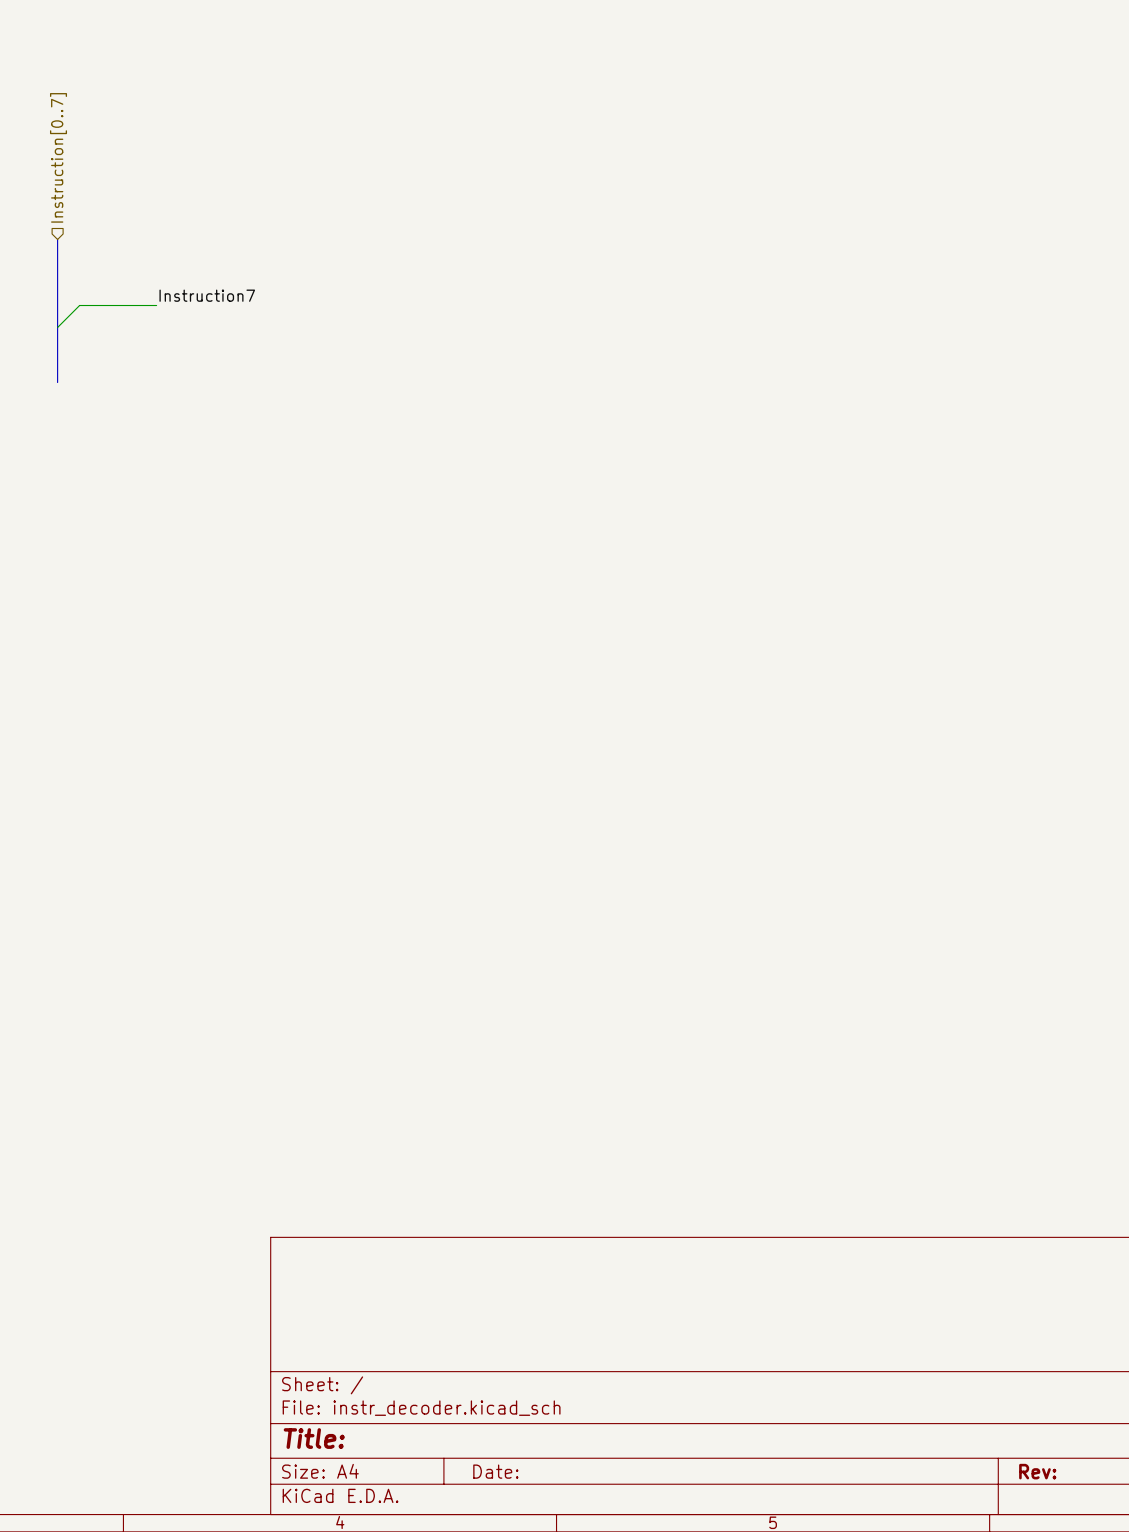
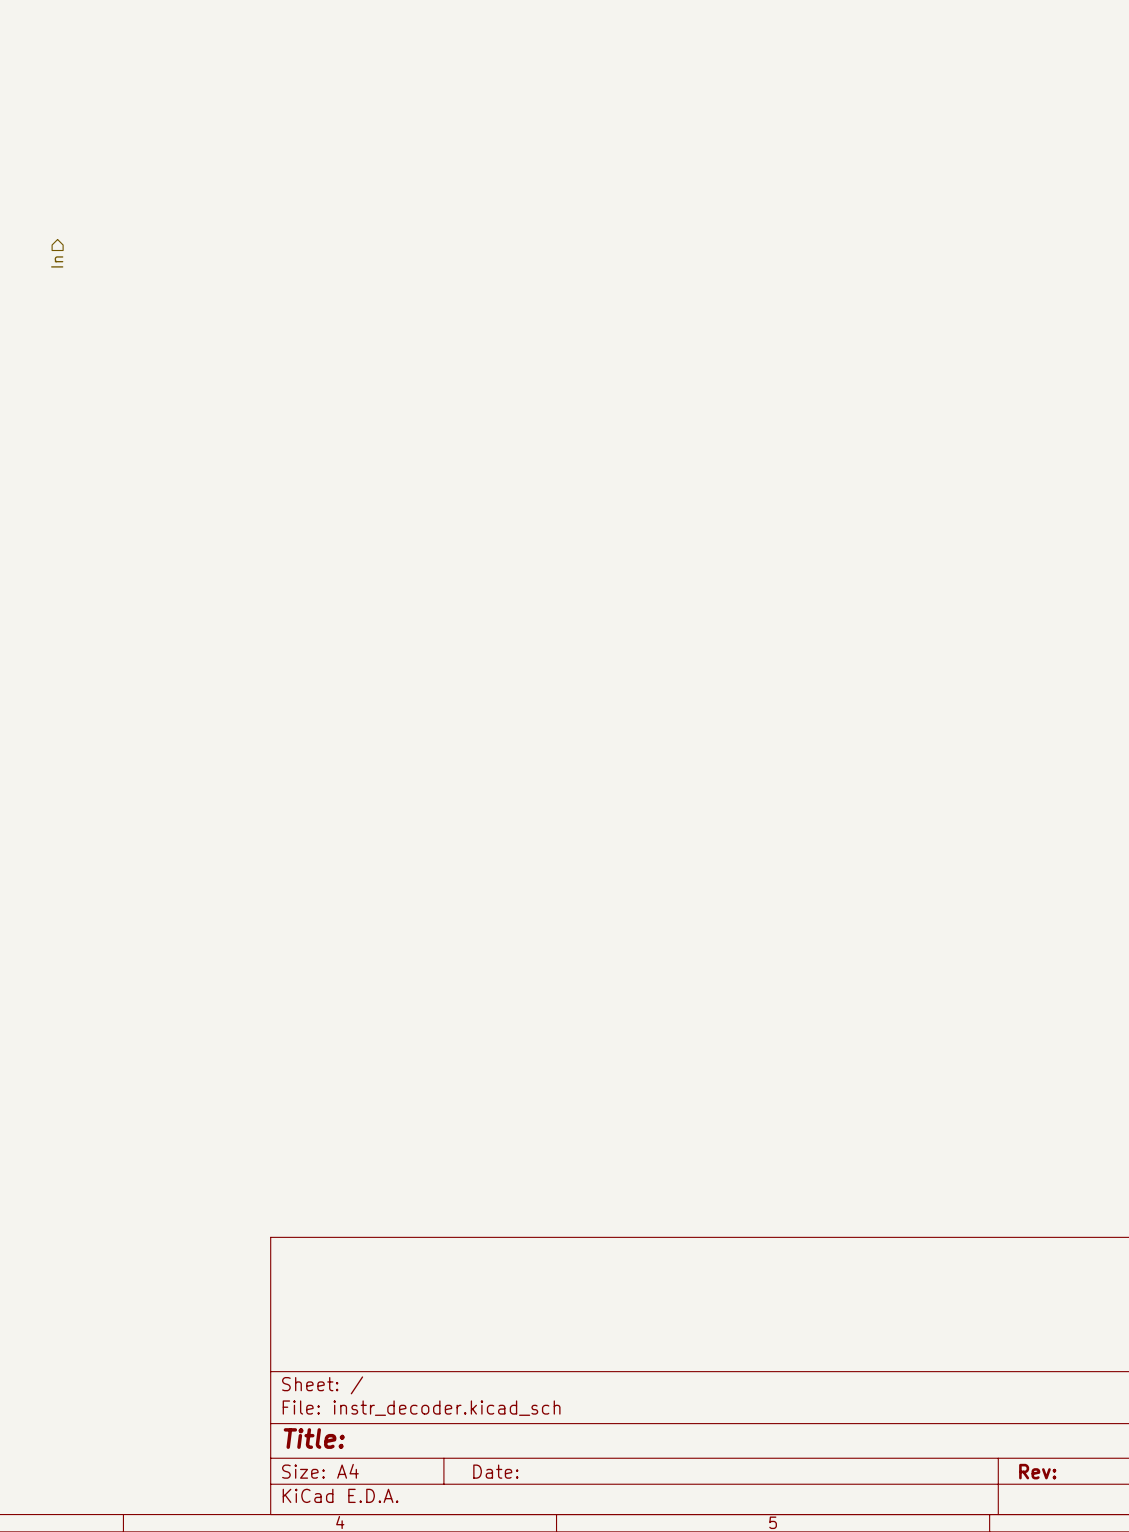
hierarchical label: Instruction[0..7] (58, 157) -> none
bus: (57, 239) (57, 382) -> none
hierarchical label: none -> In (57, 261)
label: Instruction7 (207, 295) -> none
wire: (156, 305) (79, 305) (57, 327) -> none

